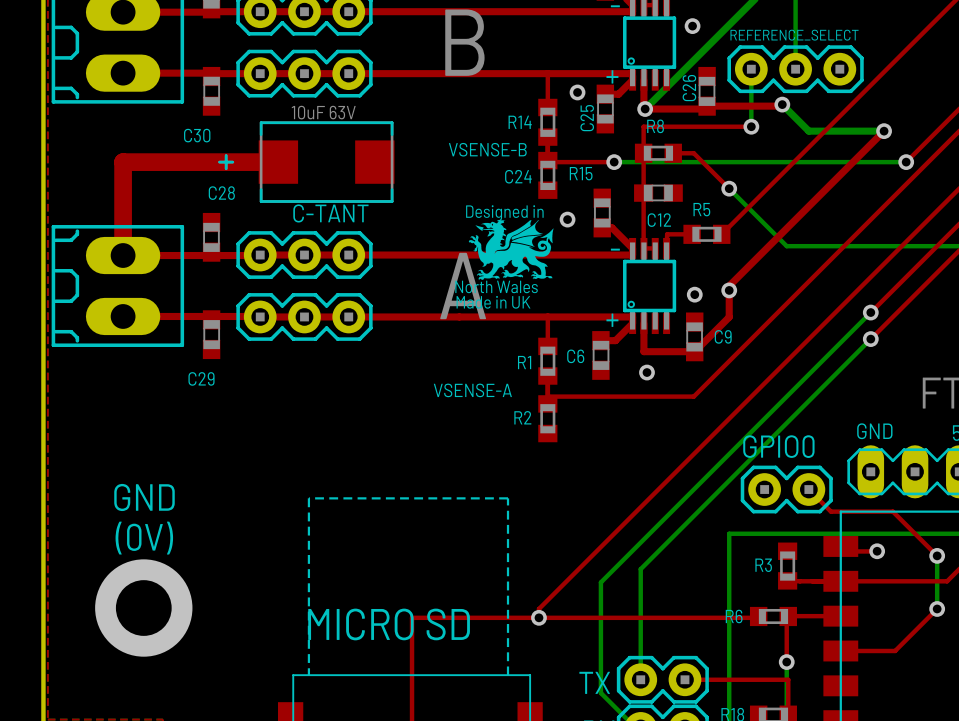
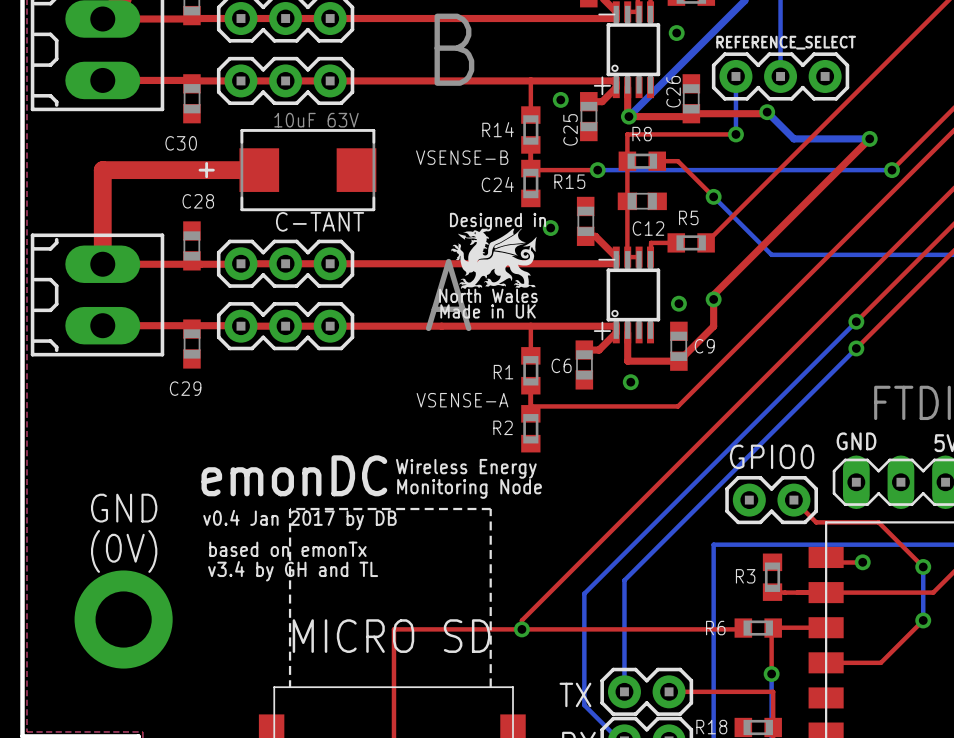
text: none -> Wireless Energy (466, 468)
text: none -> emonDC (294, 475)
text: none -> Monitoring Node (469, 488)
text: none -> v0.4 Jan 2017 by DB (299, 520)
text: none -> based on emonTx (287, 549)
text: none -> v3.4 by GH and TL (293, 571)

